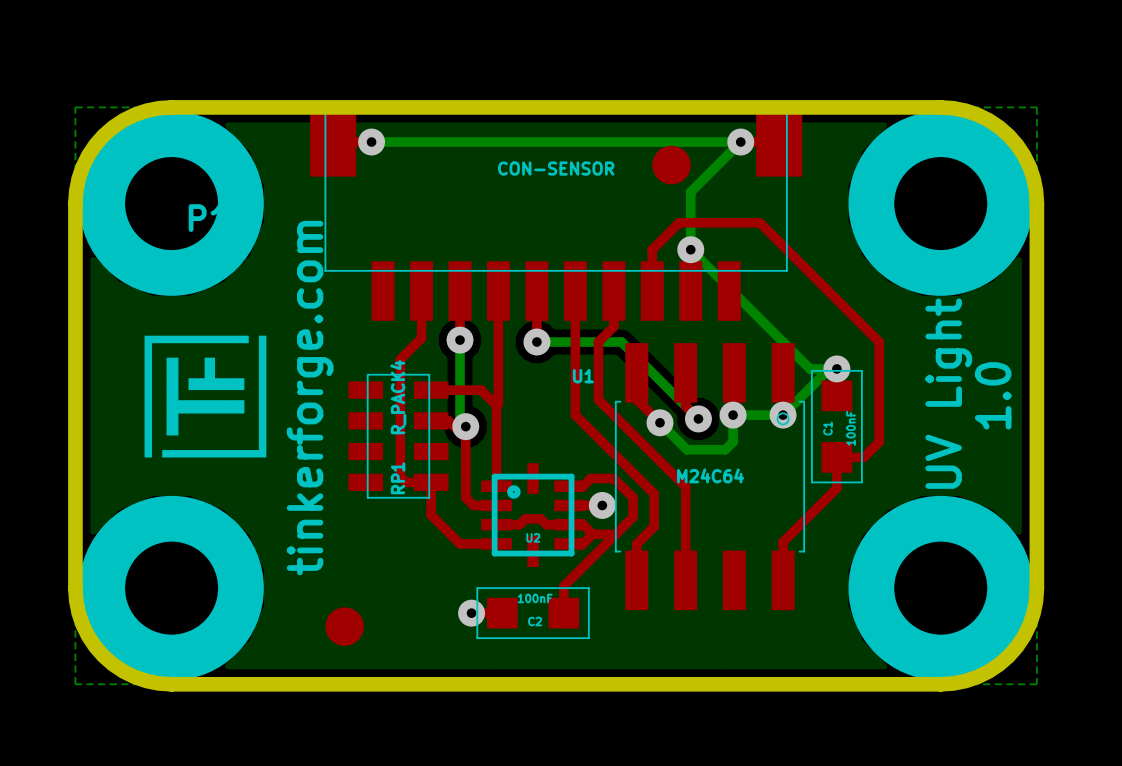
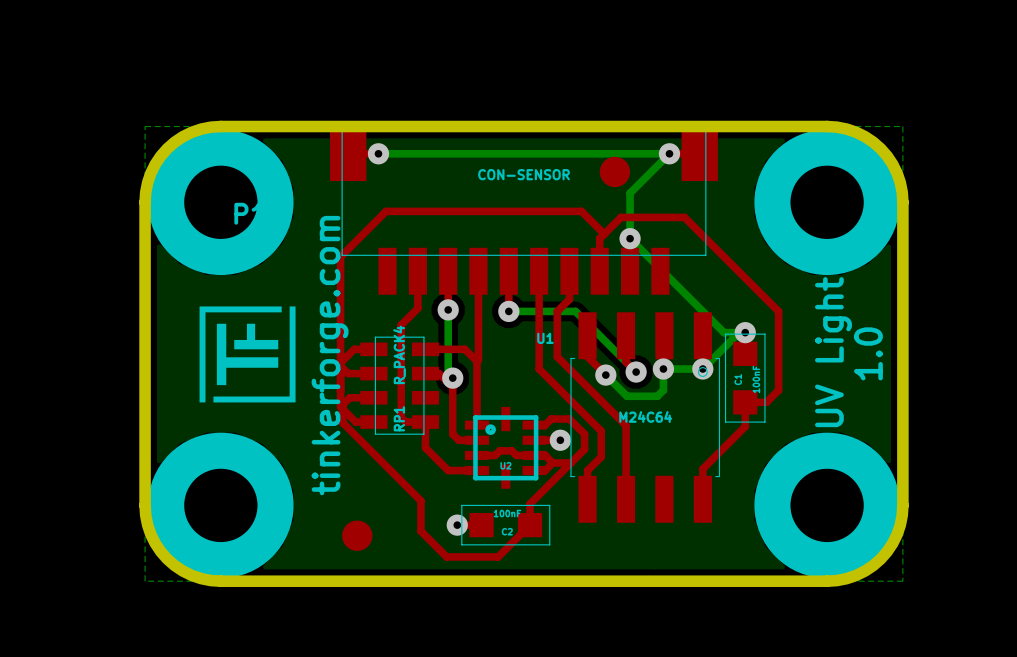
top track: none -> (604, 234) (581, 211) (386, 211) (340, 256) (340, 406)
top track: none -> (373, 349) (354, 349) (340, 362)
top track: none -> (340, 365) (348, 373) (373, 373)
top track: none -> (373, 397) (349, 397) (340, 406)
top track: none -> (342, 404) (342, 422) (420, 500) (420, 531) (446, 556) (498, 556) (530, 525)
top track: none -> (340, 406) (355, 422) (373, 422)

